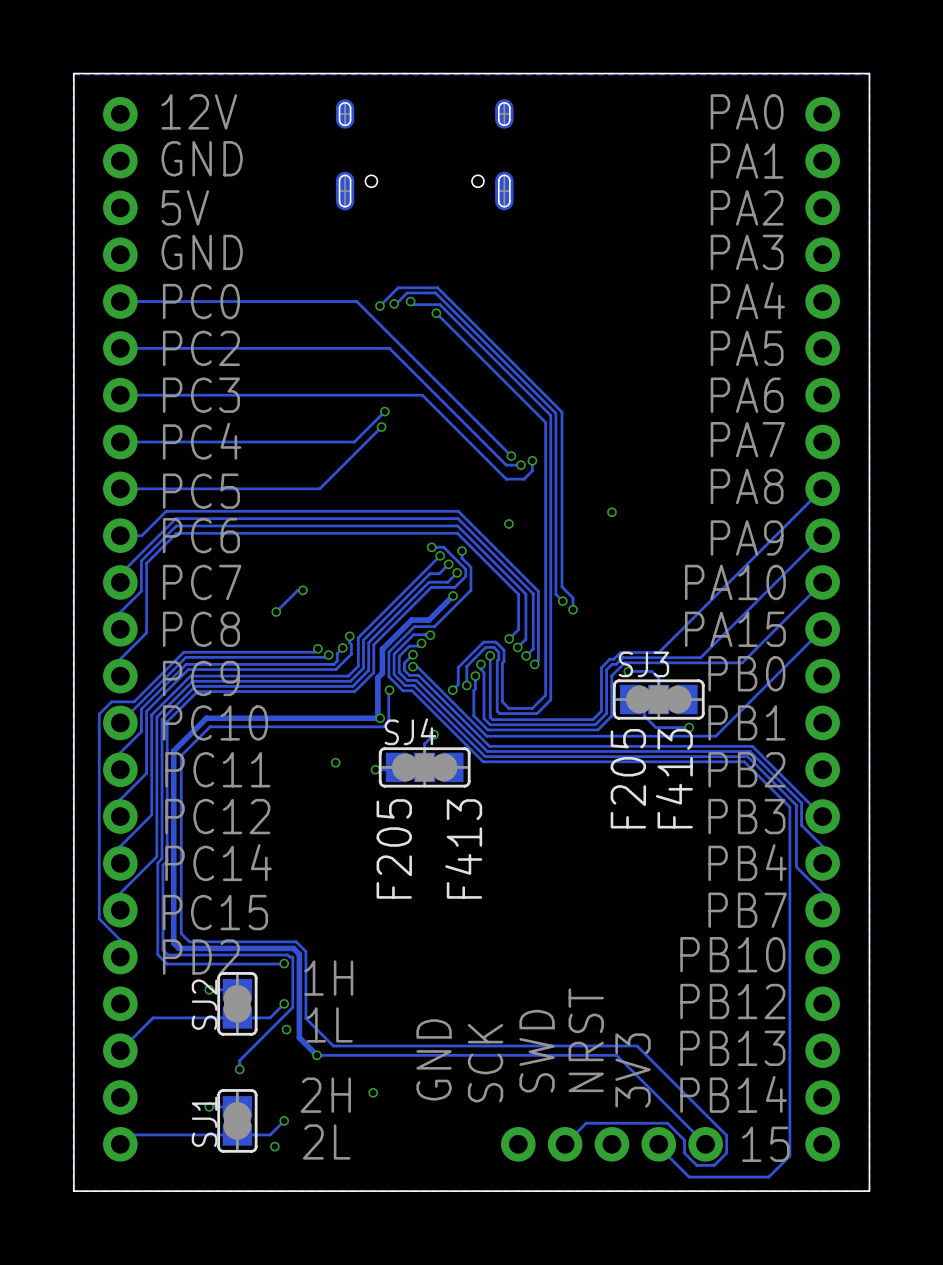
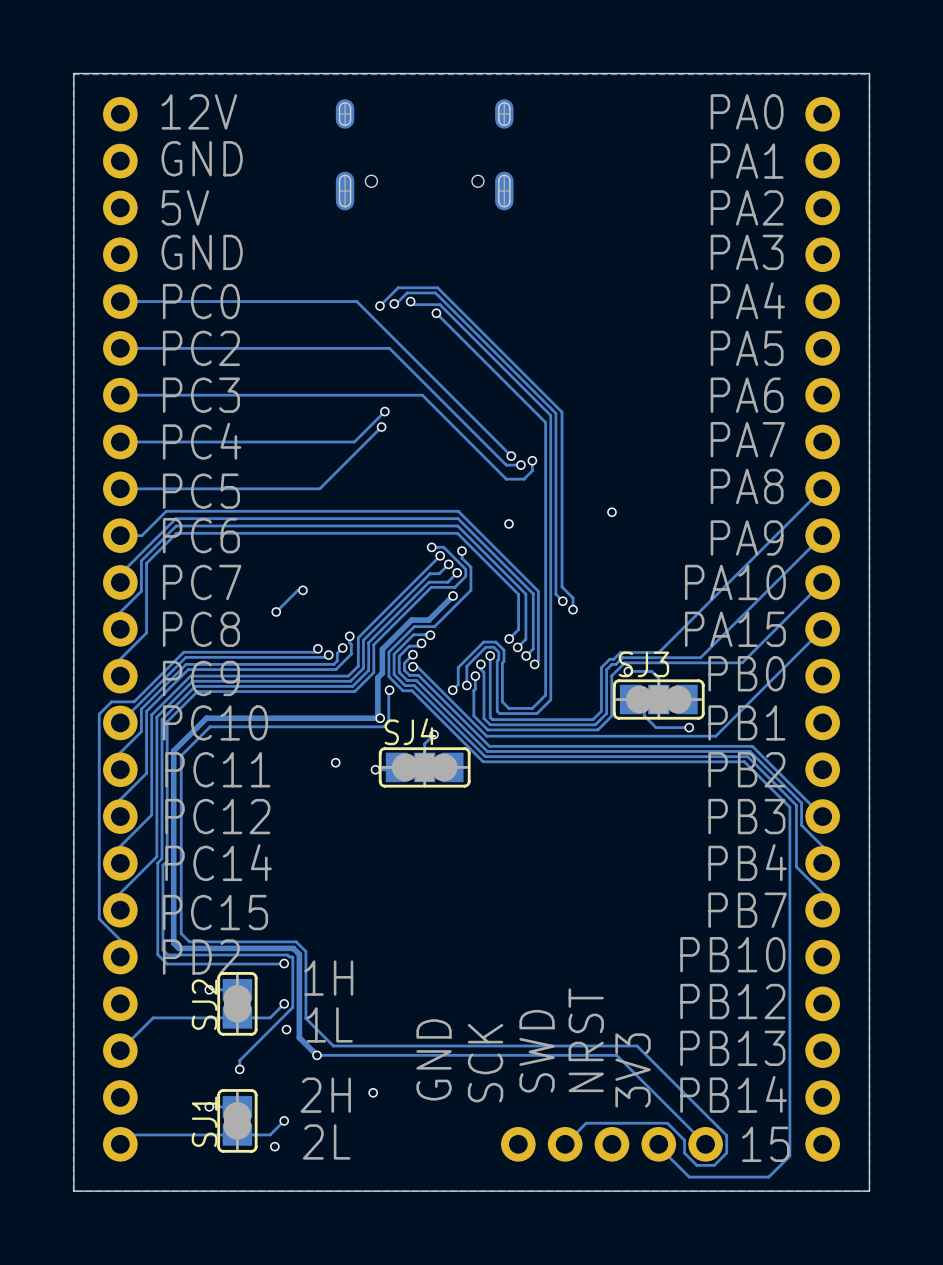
text: F205 (628, 778) -> none
text: F413 (674, 778) -> none
text: F205 (394, 848) -> none
text: F413 (463, 848) -> none

